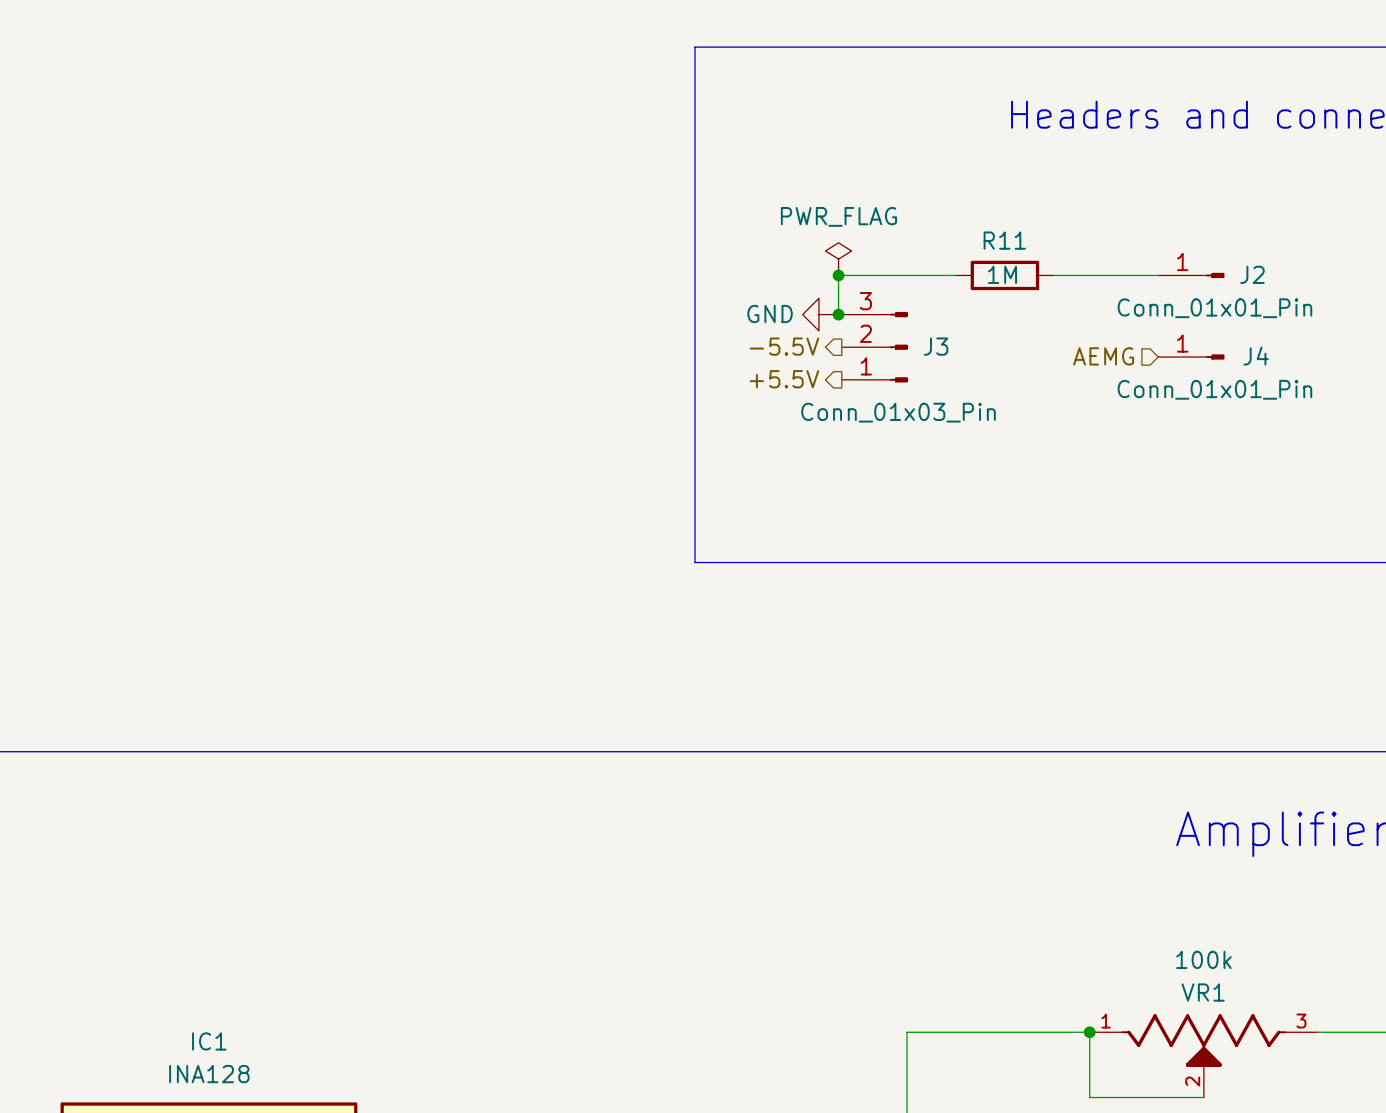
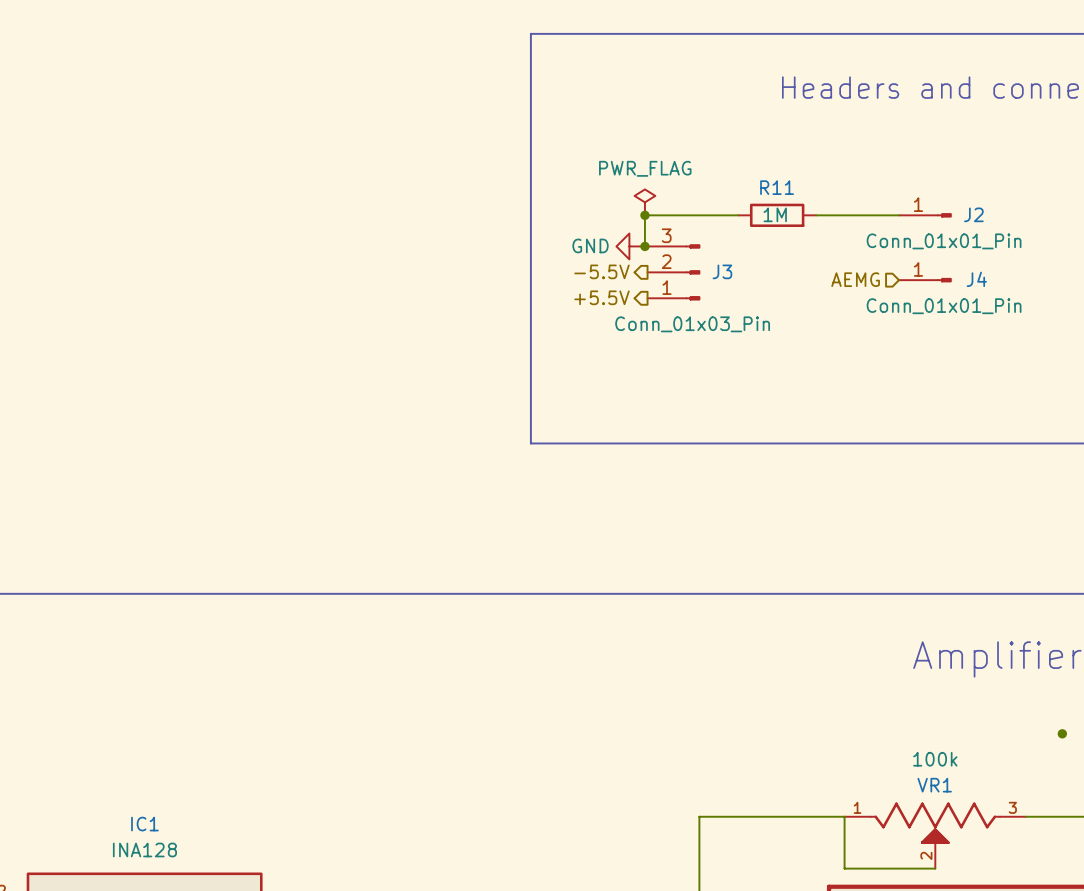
junction: none -> (1062, 733)
junction: (1089, 1032) -> none

